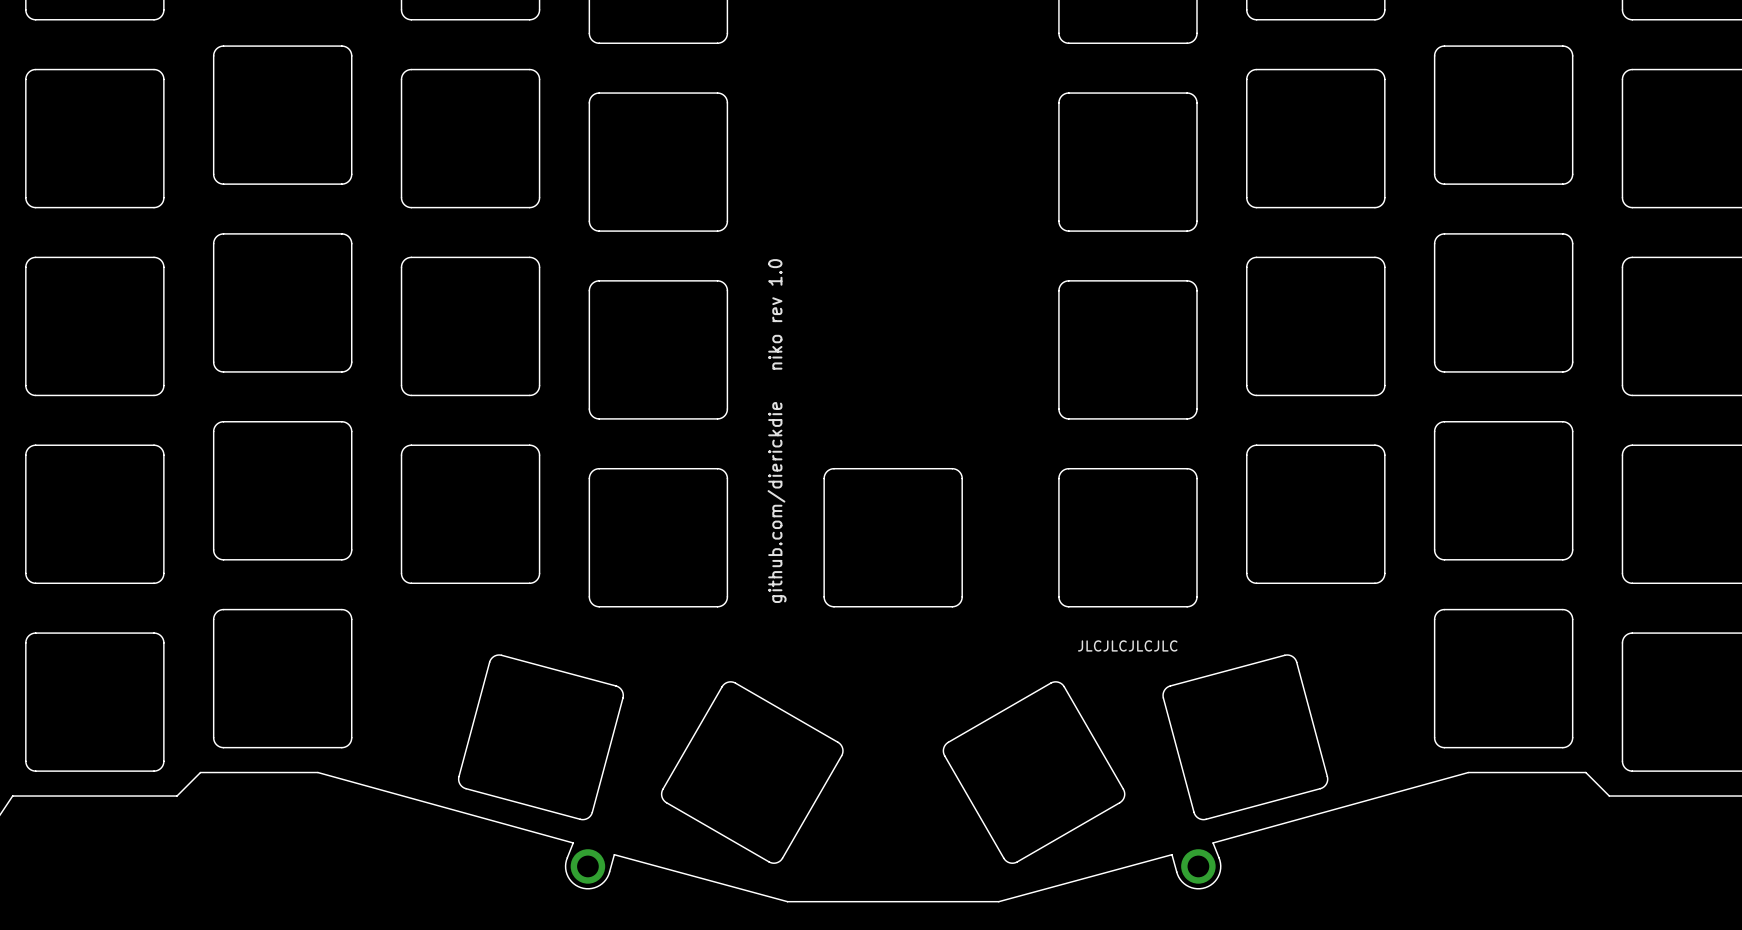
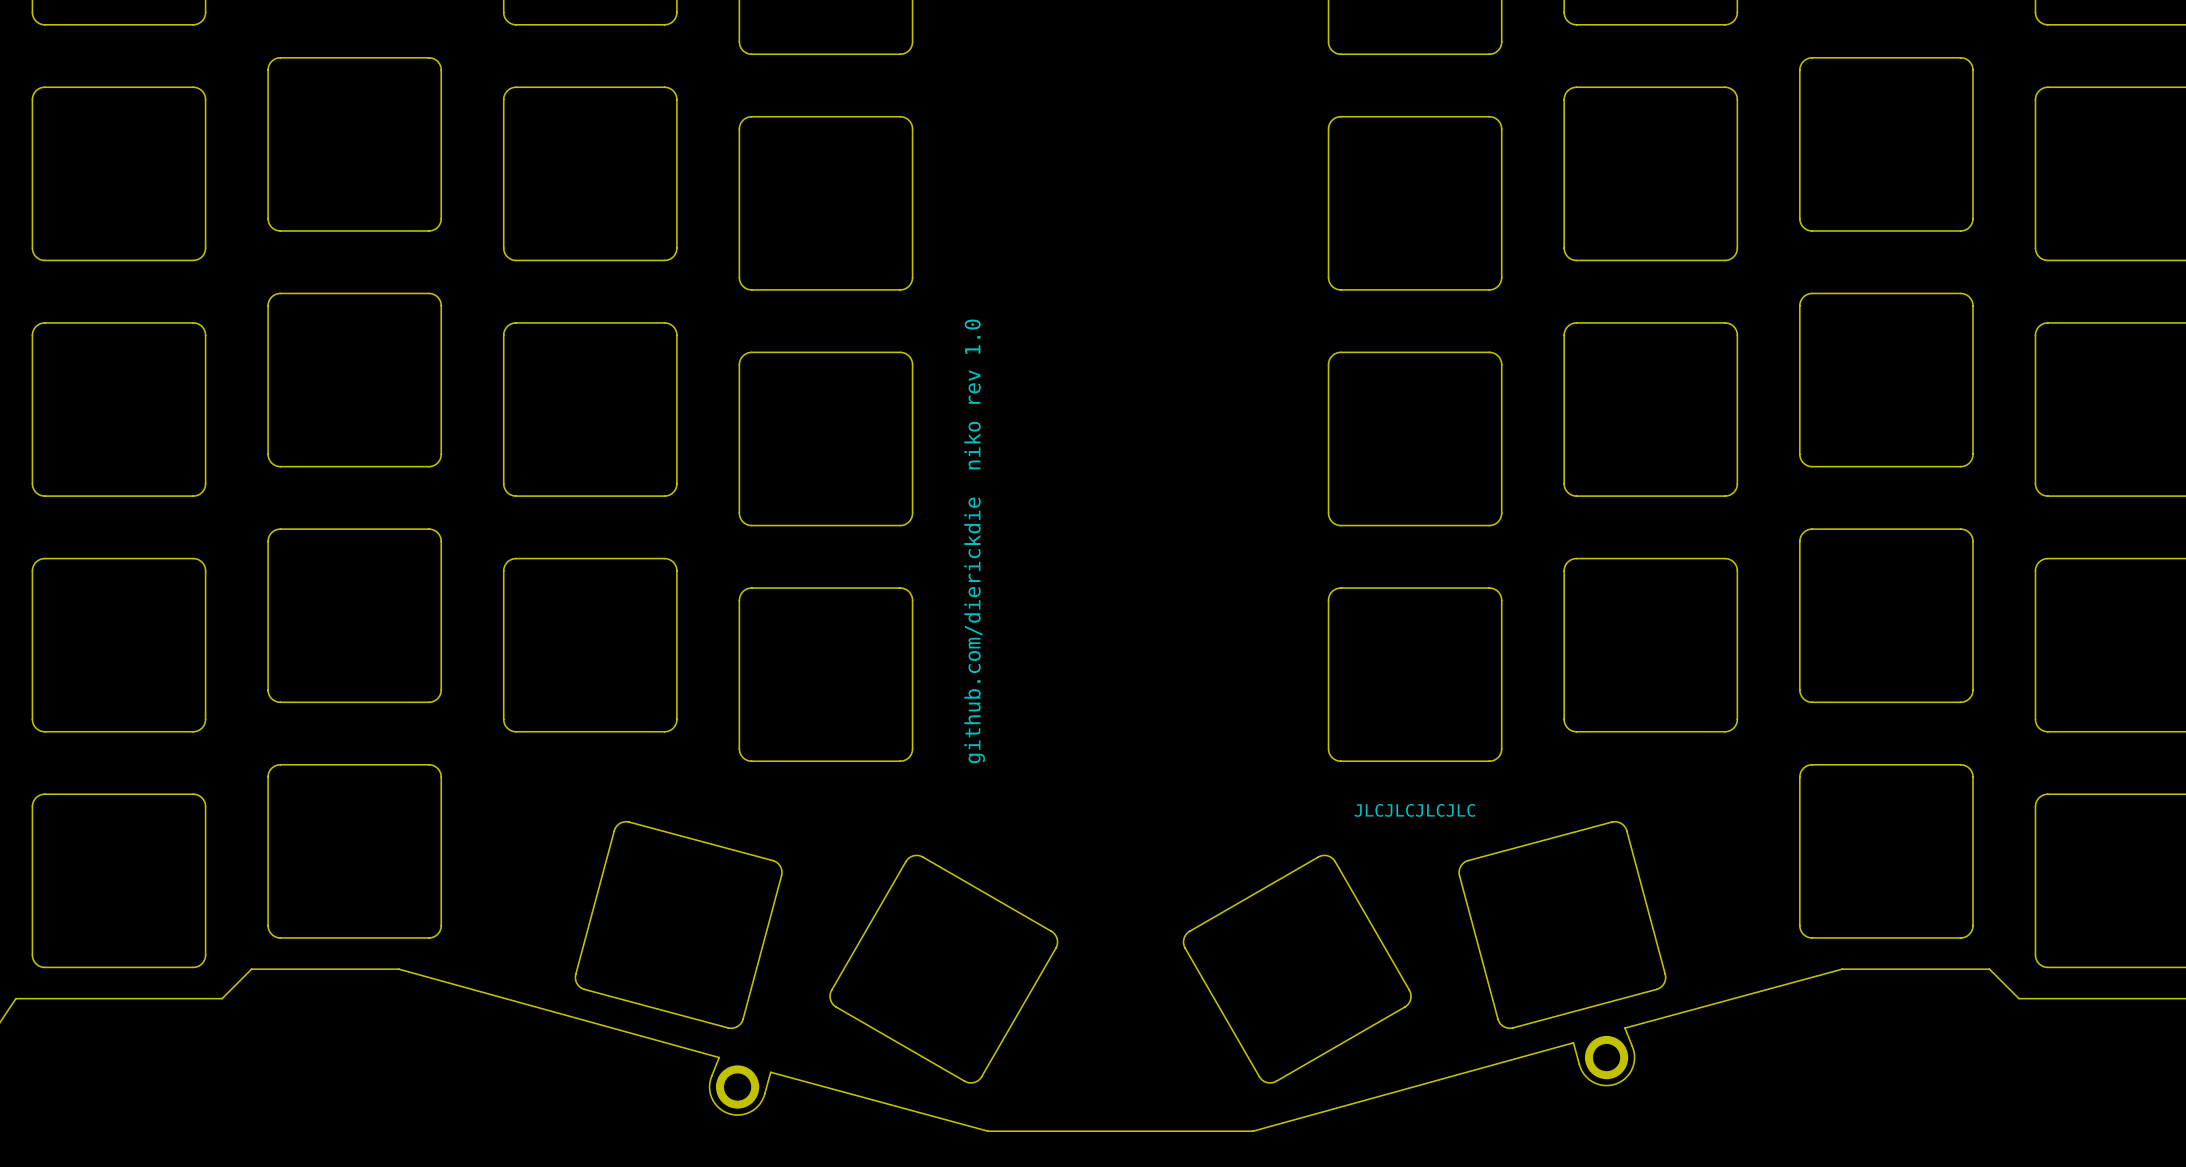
drawing: [823, 468, 963, 608] -> none
board edge: (1468, 772) (1213, 842) (1219, 860) (1220, 871) (1214, 881) (1205, 887) (1194, 888) (1182, 881) (1177, 874) (1171, 854) (998, 901) -> (1842, 969) (1624, 1028) (1633, 1049) (1633, 1063) (1627, 1076) (1615, 1084) (1601, 1085) (1586, 1076) (1580, 1067) (1573, 1042) (1253, 1131)
part position: (1198, 866) -> (1606, 1057)

